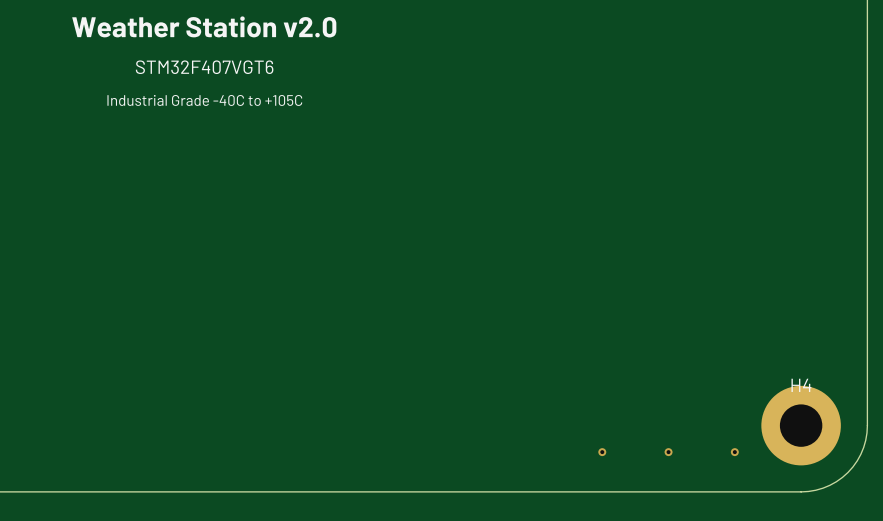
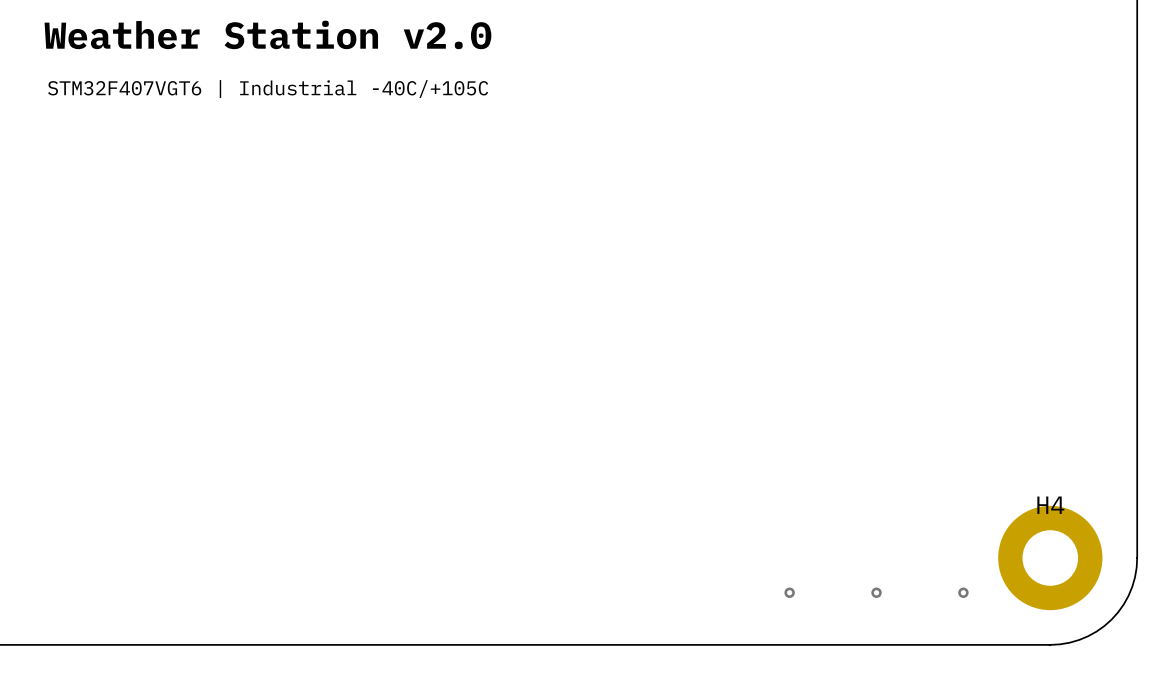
text: STM32F407VGT6 (204, 67) -> STM32F407VGT6 | Industrial -40C/+105C (268, 89)
text: Industrial Grade -40C to +105C (204, 100) -> none

